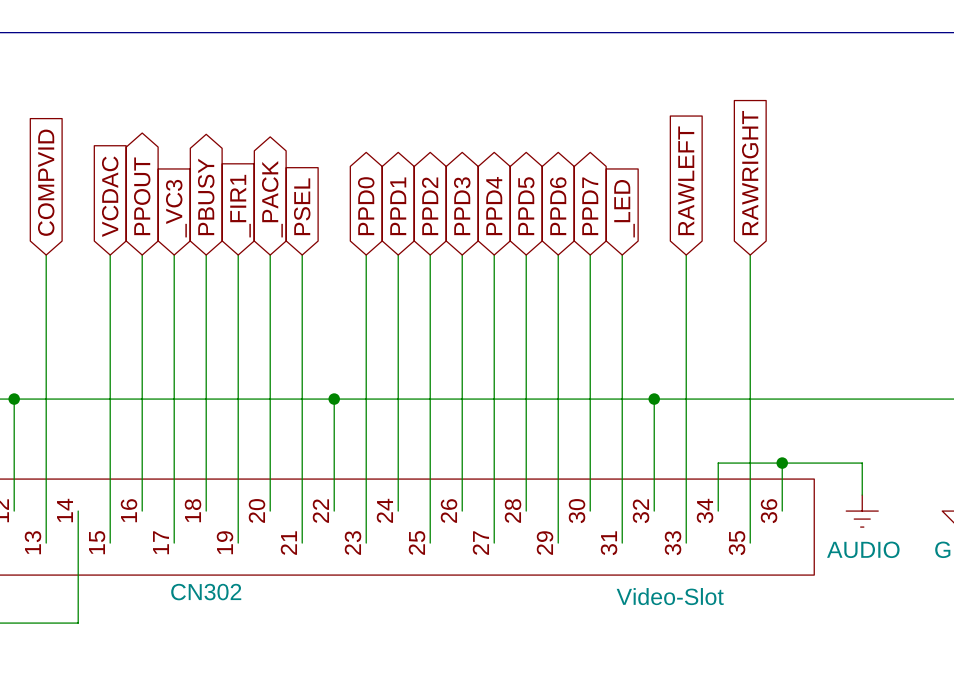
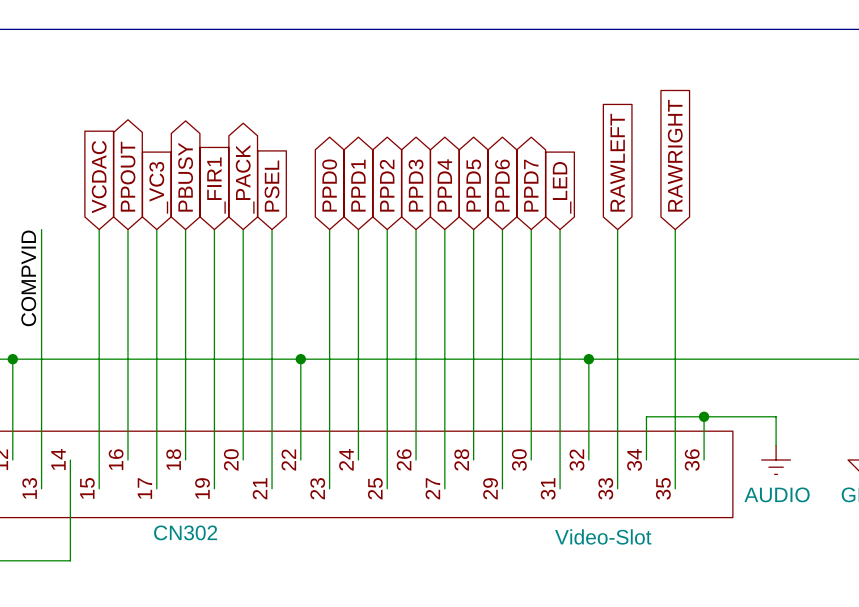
global label: COMPVID (46, 182) -> none
label: none -> COMPVID (28, 278)

